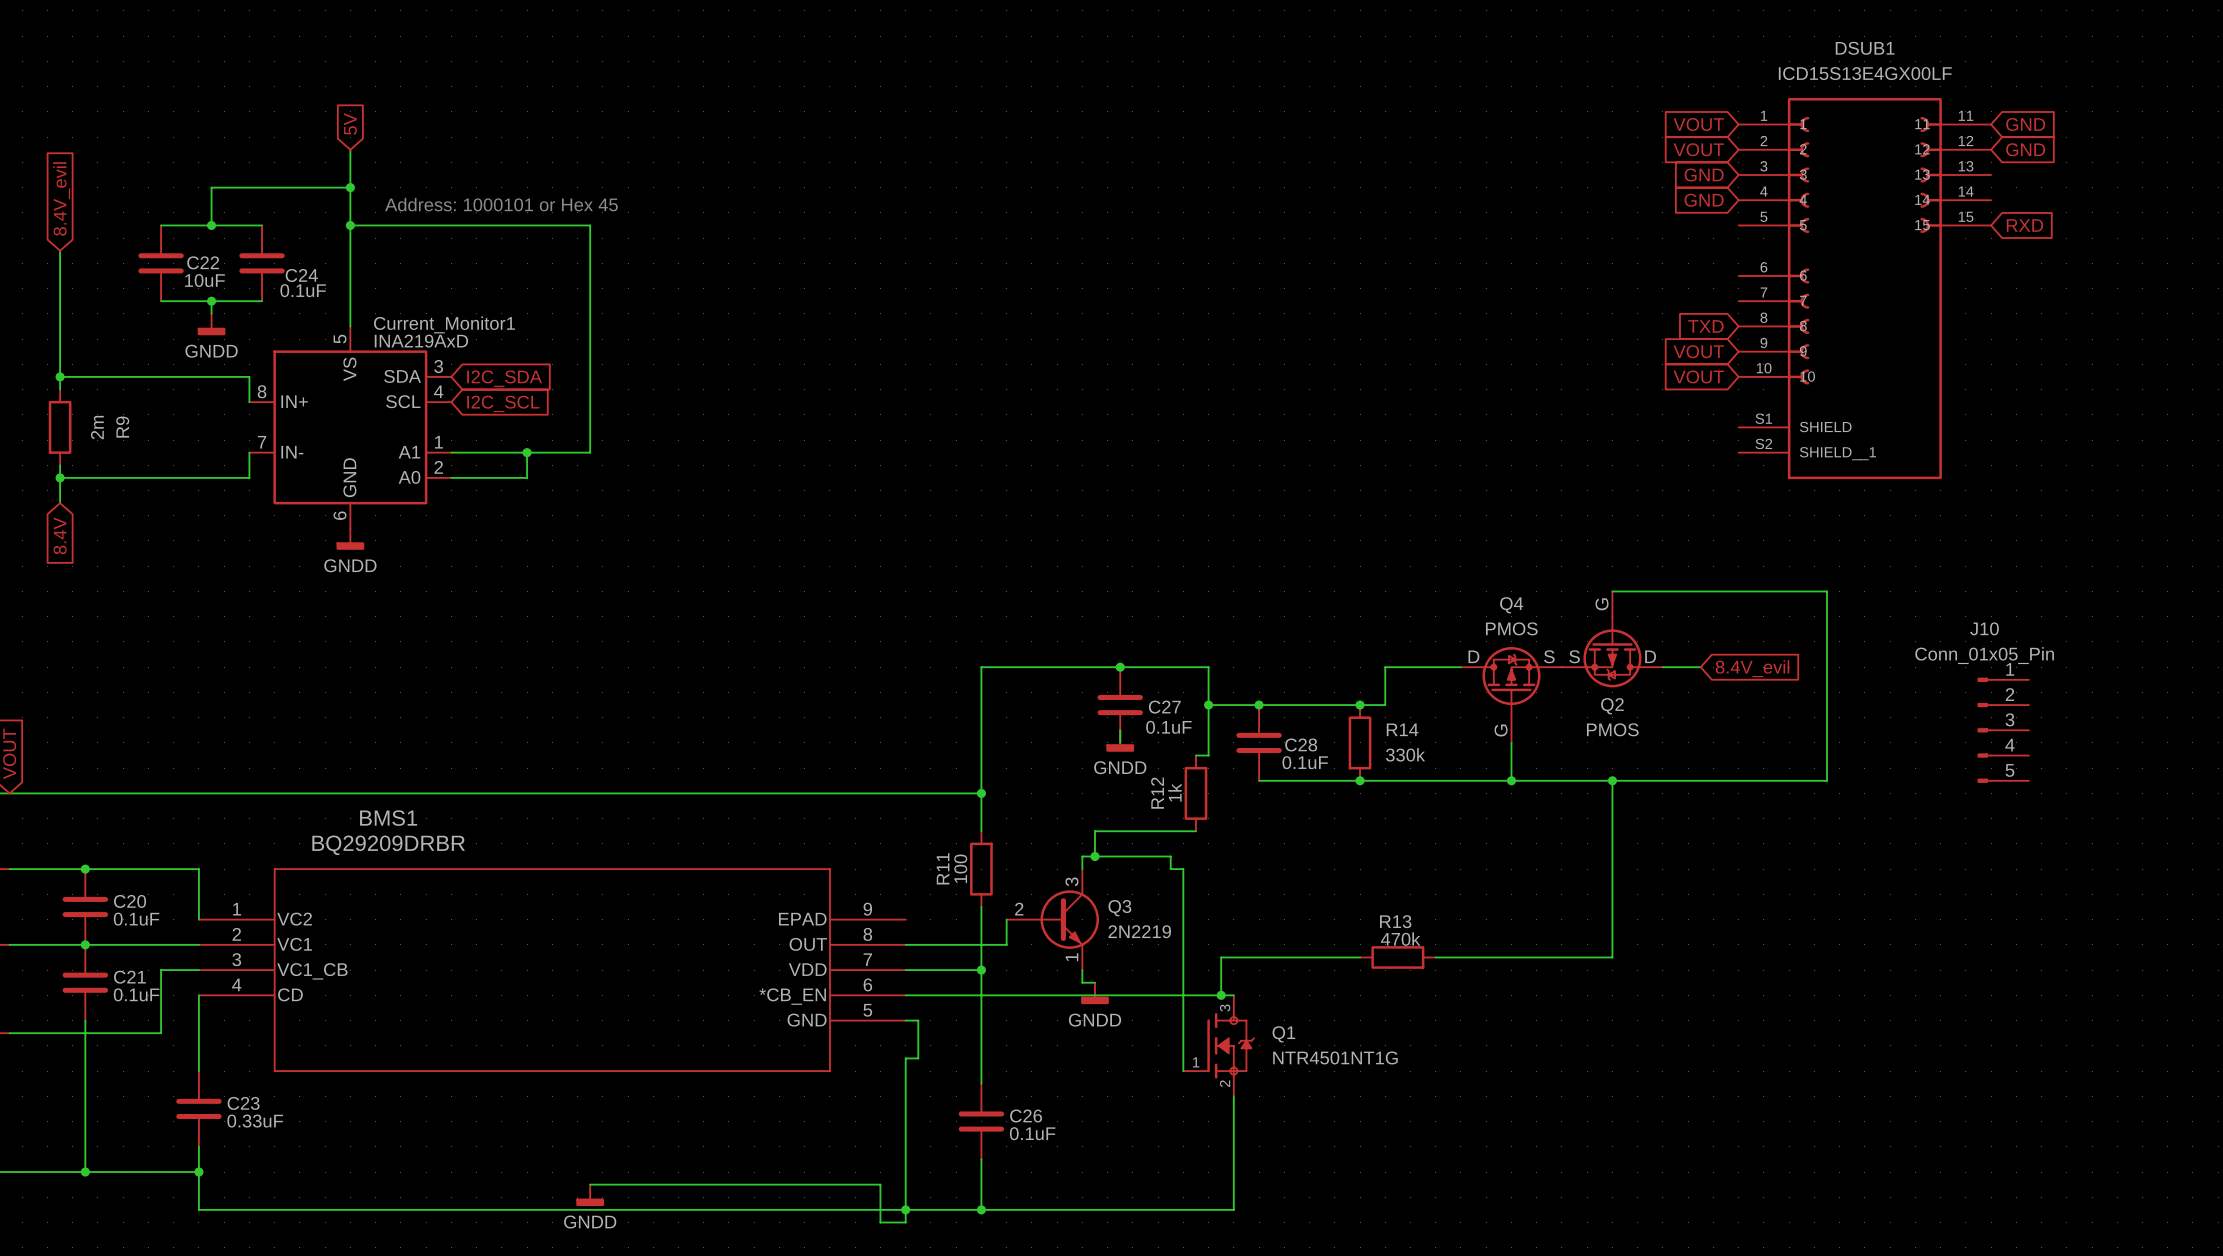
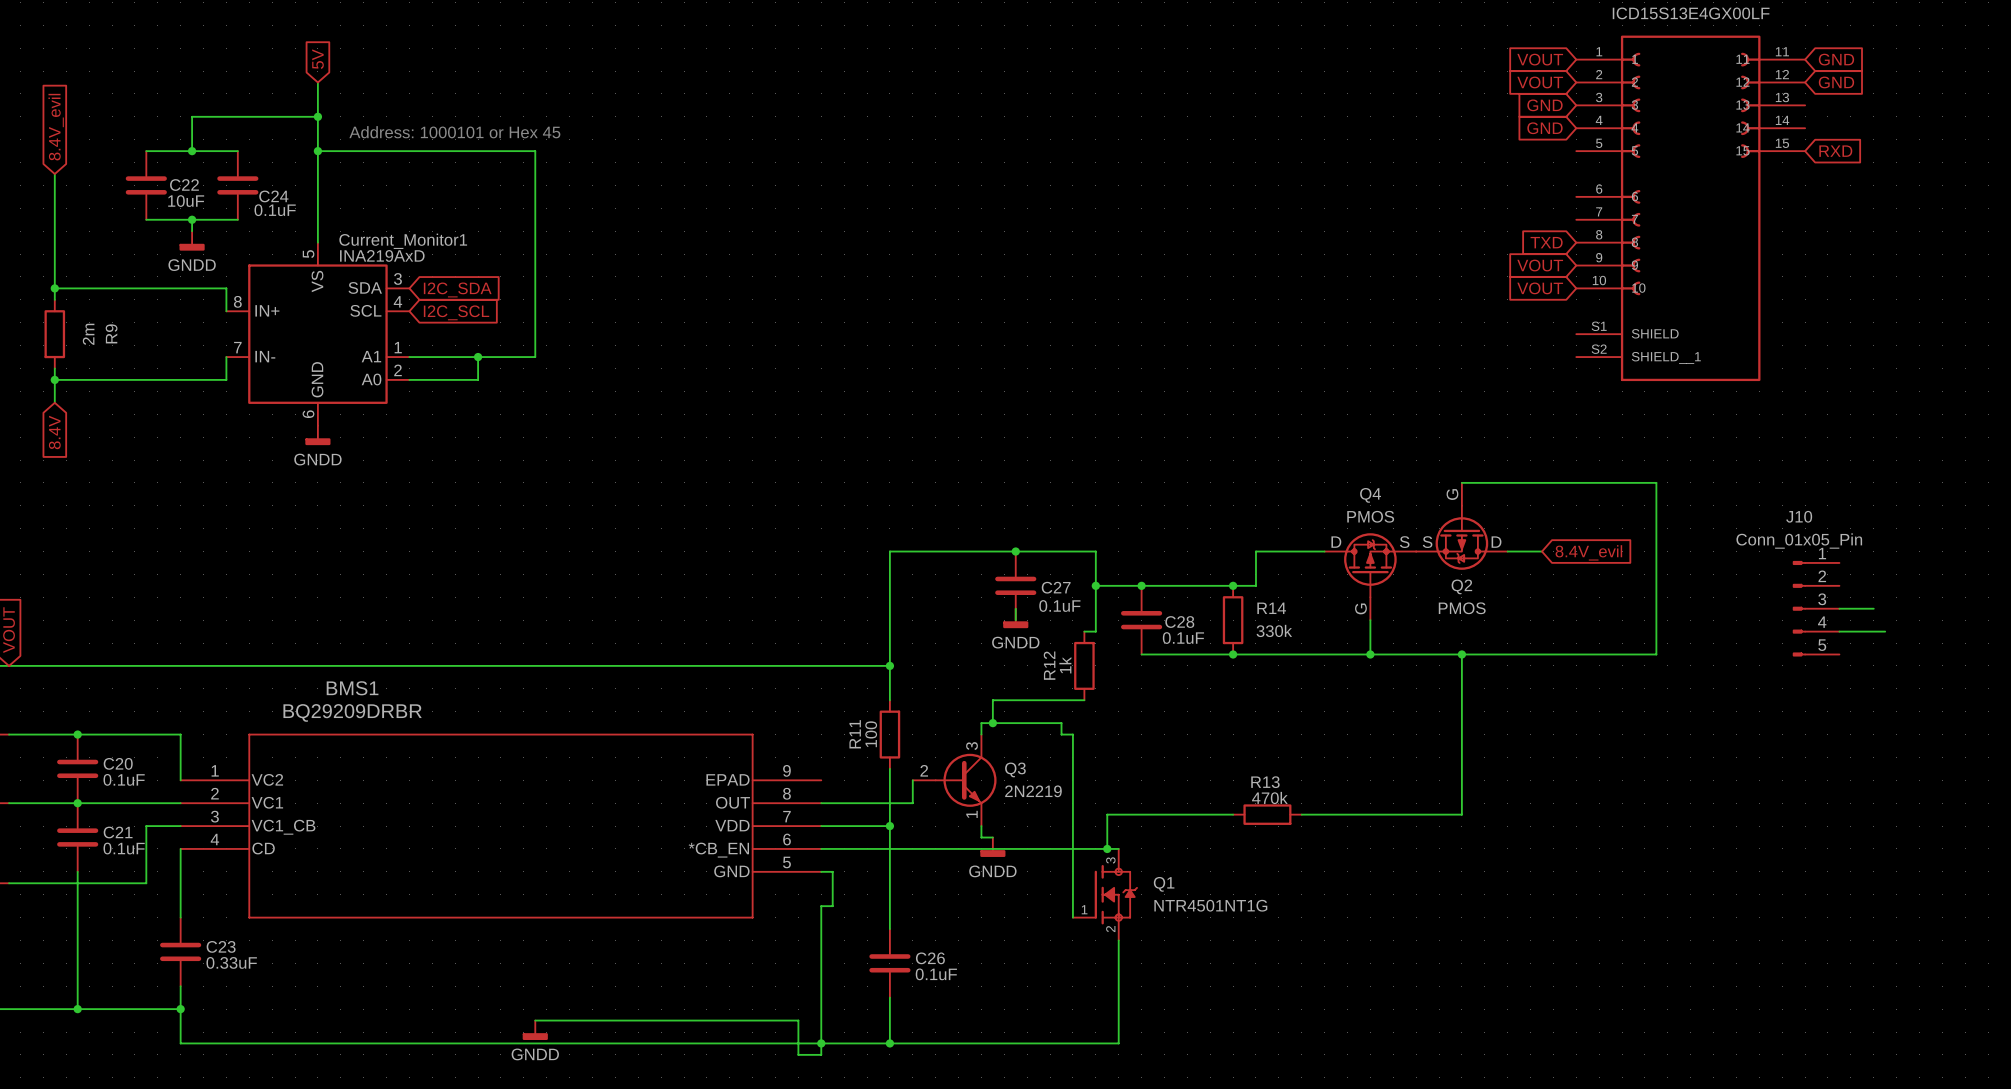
wire: none -> (1839, 608) (1873, 608)
wire: none -> (1839, 631) (1885, 631)

